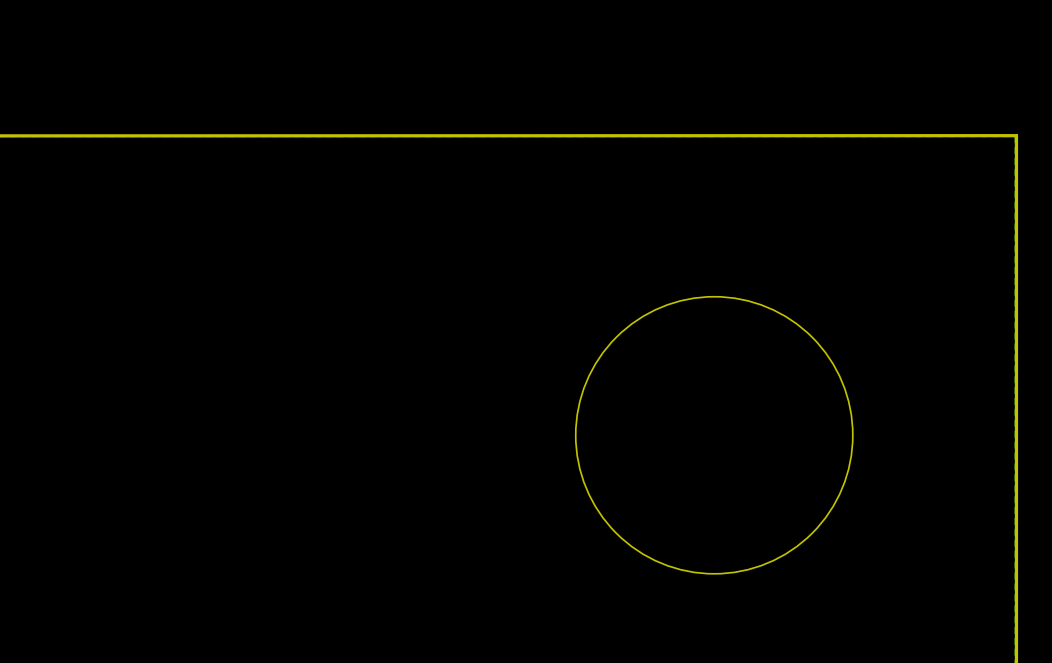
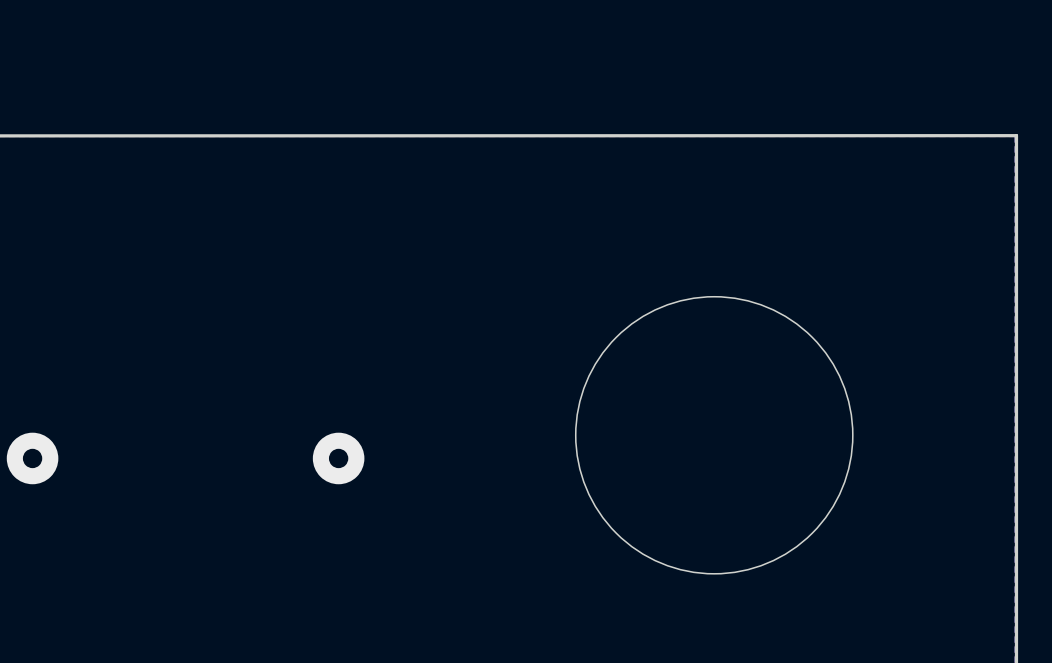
via: none -> (32, 458)
via: none -> (338, 458)

